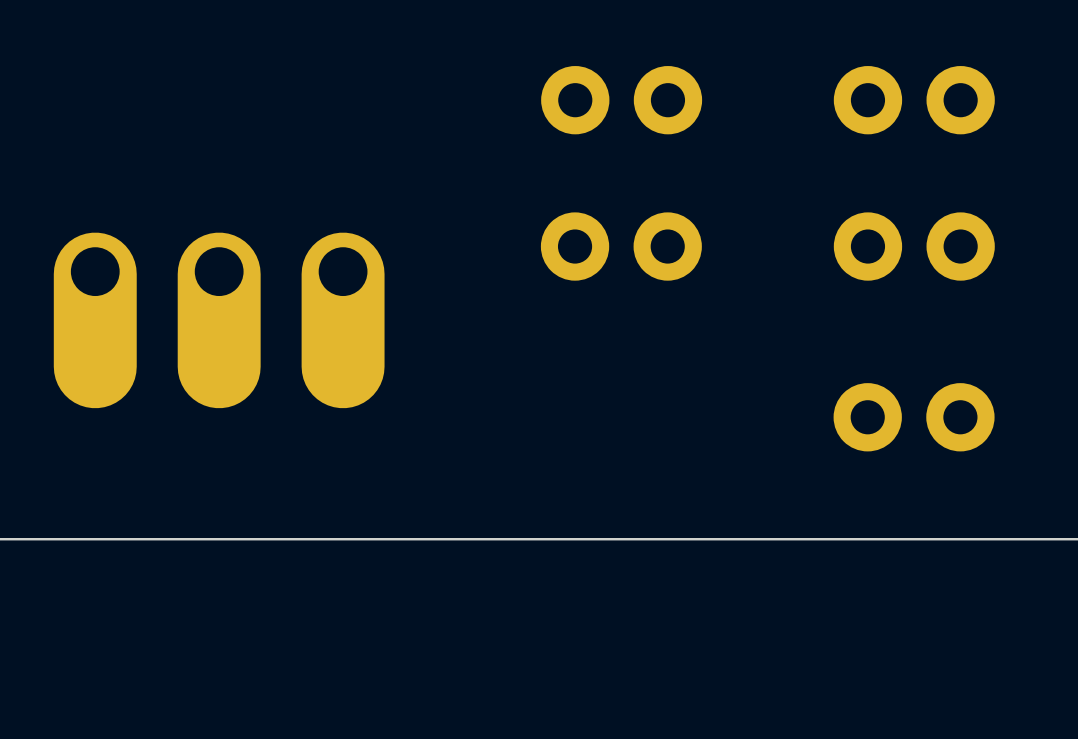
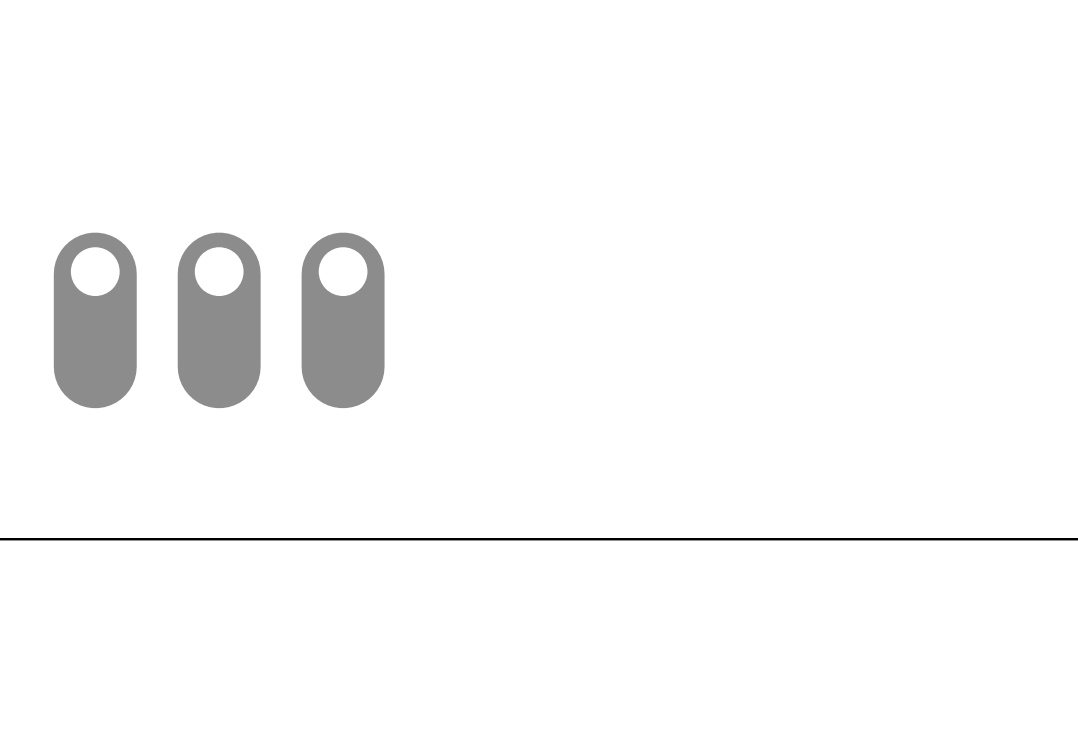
part: (621, 100) -> none
part: (914, 100) -> none
part: (621, 246) -> none
part: (914, 246) -> none
part: (914, 417) -> none

